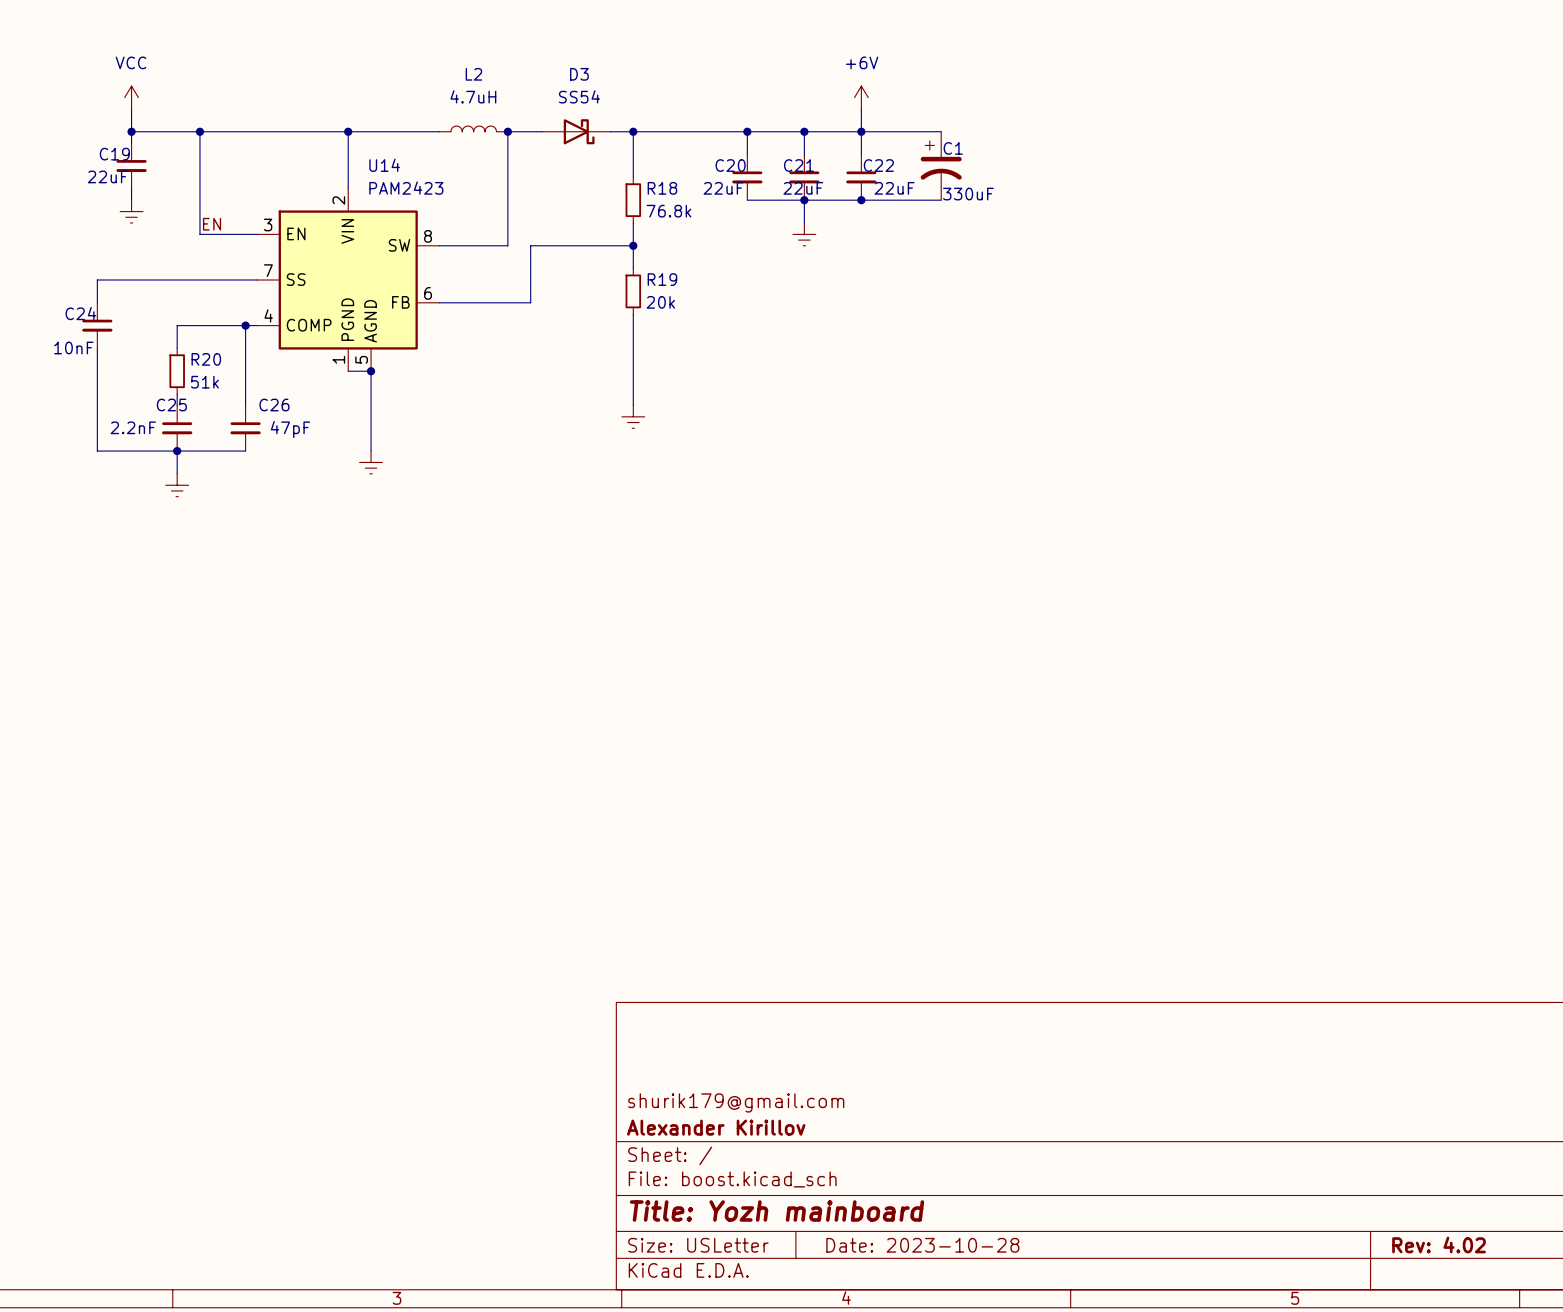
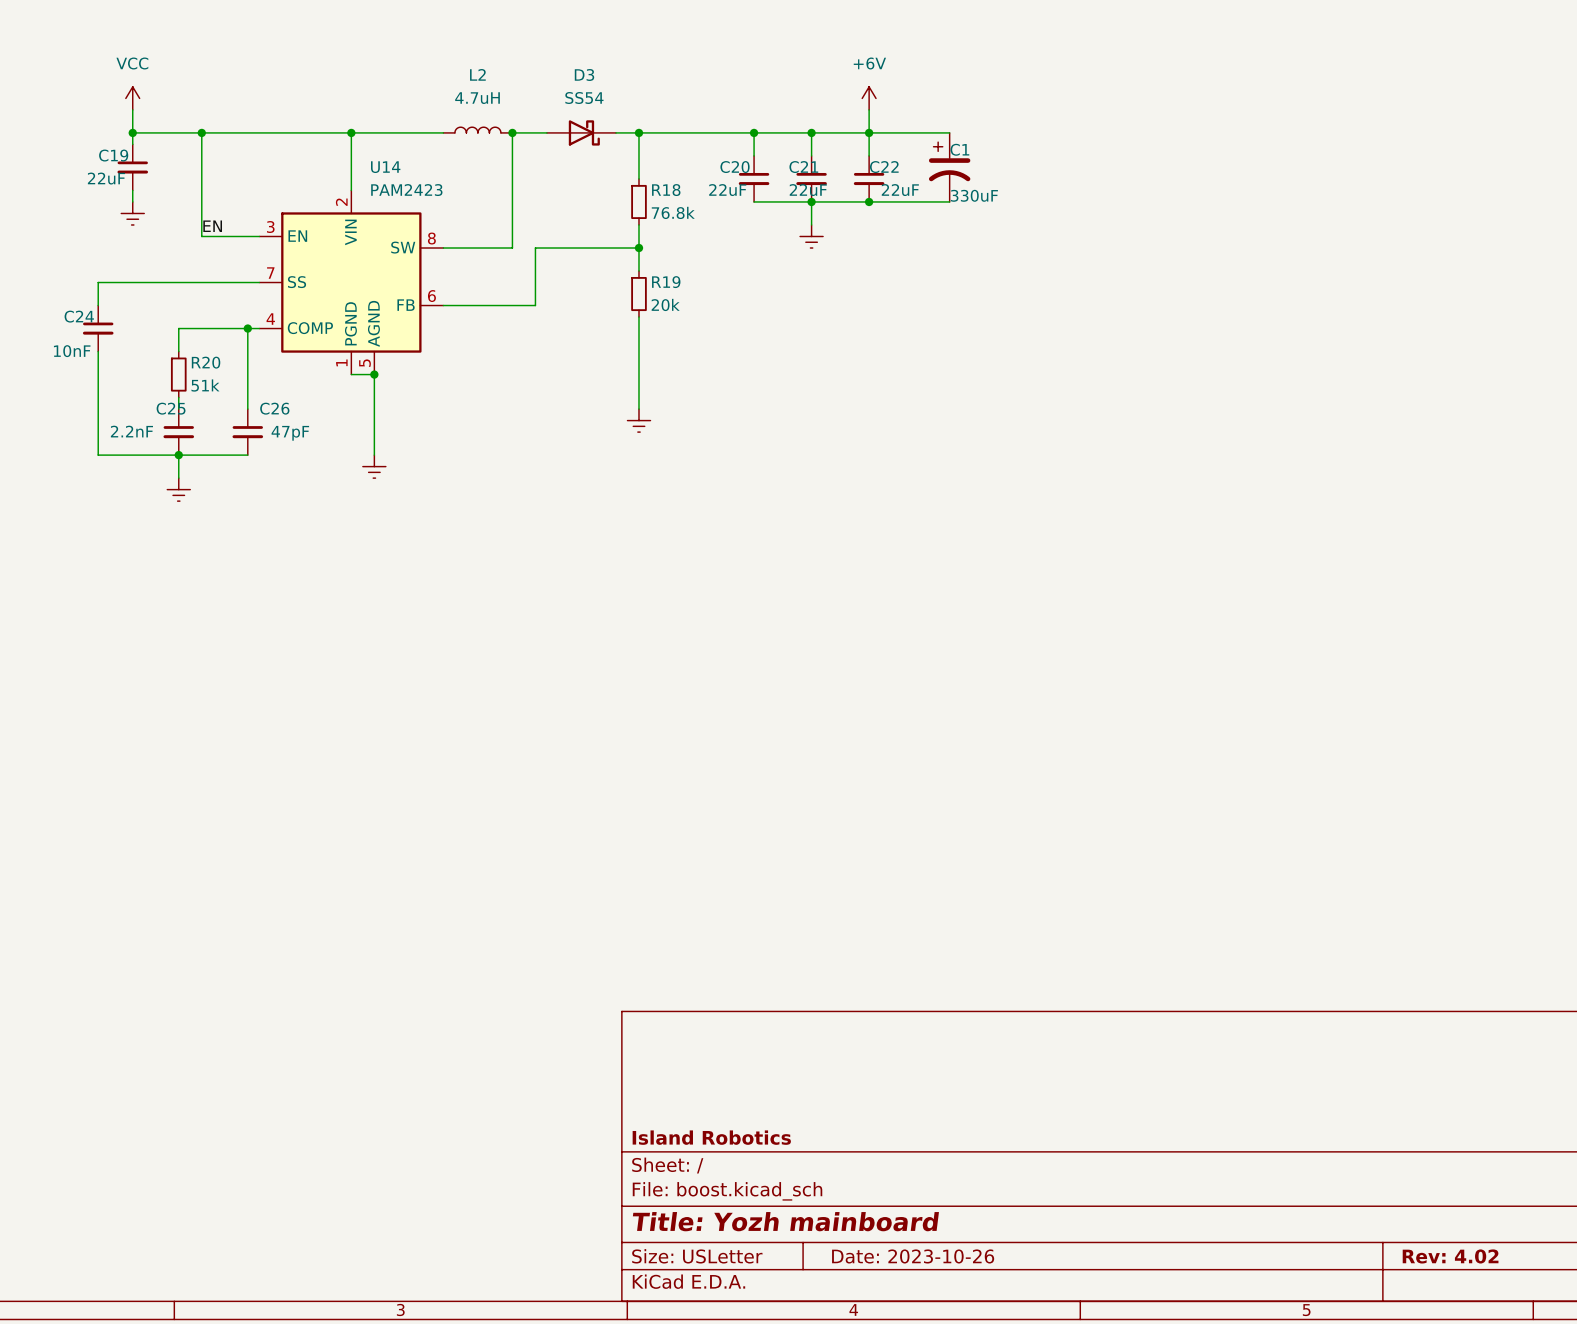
title block: shurik179@gmail.com (736, 1102) -> none
title block: Alexander Kirillov (716, 1127) -> Island Robotics (711, 1137)
title block: Date: 2023-10-28 (922, 1245) -> Date: 2023-10-26 (913, 1256)

